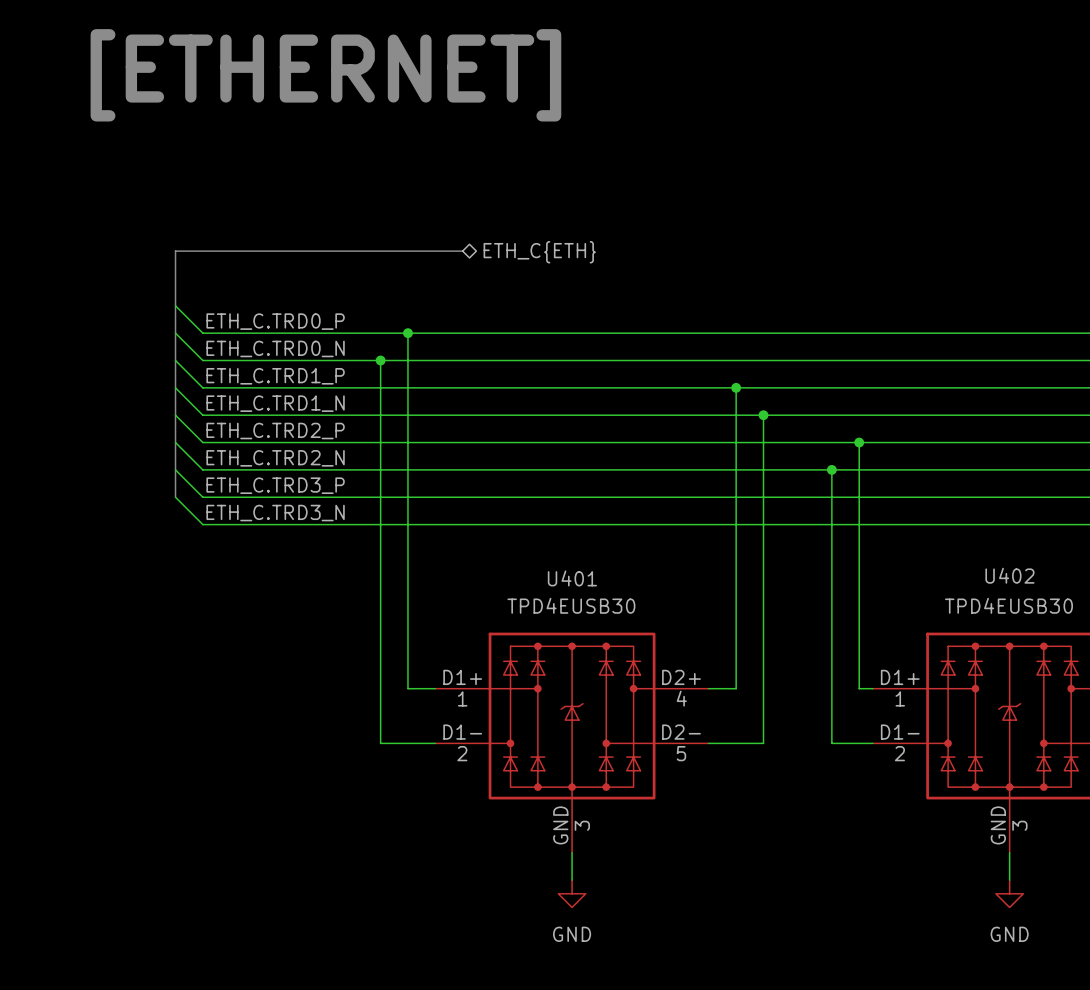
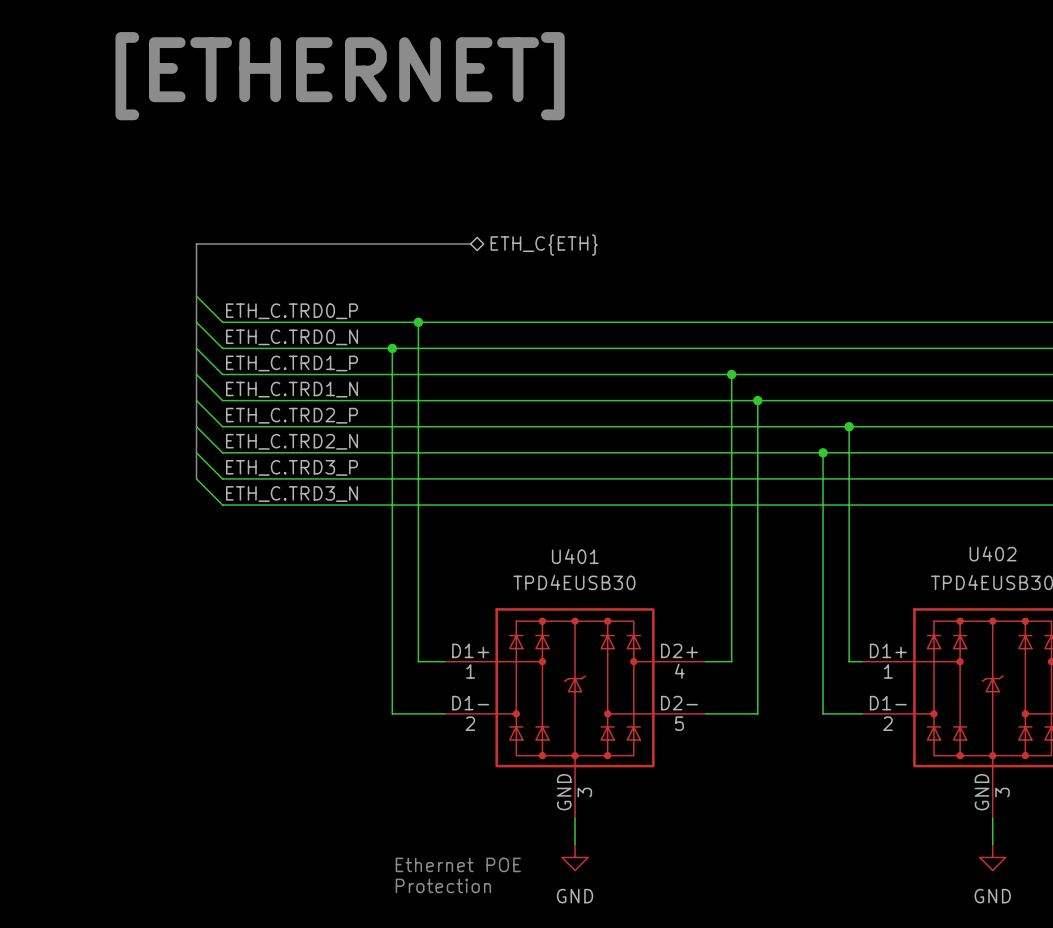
text: none -> Ethernet POE (458, 864)
text: none -> Protection (443, 885)

